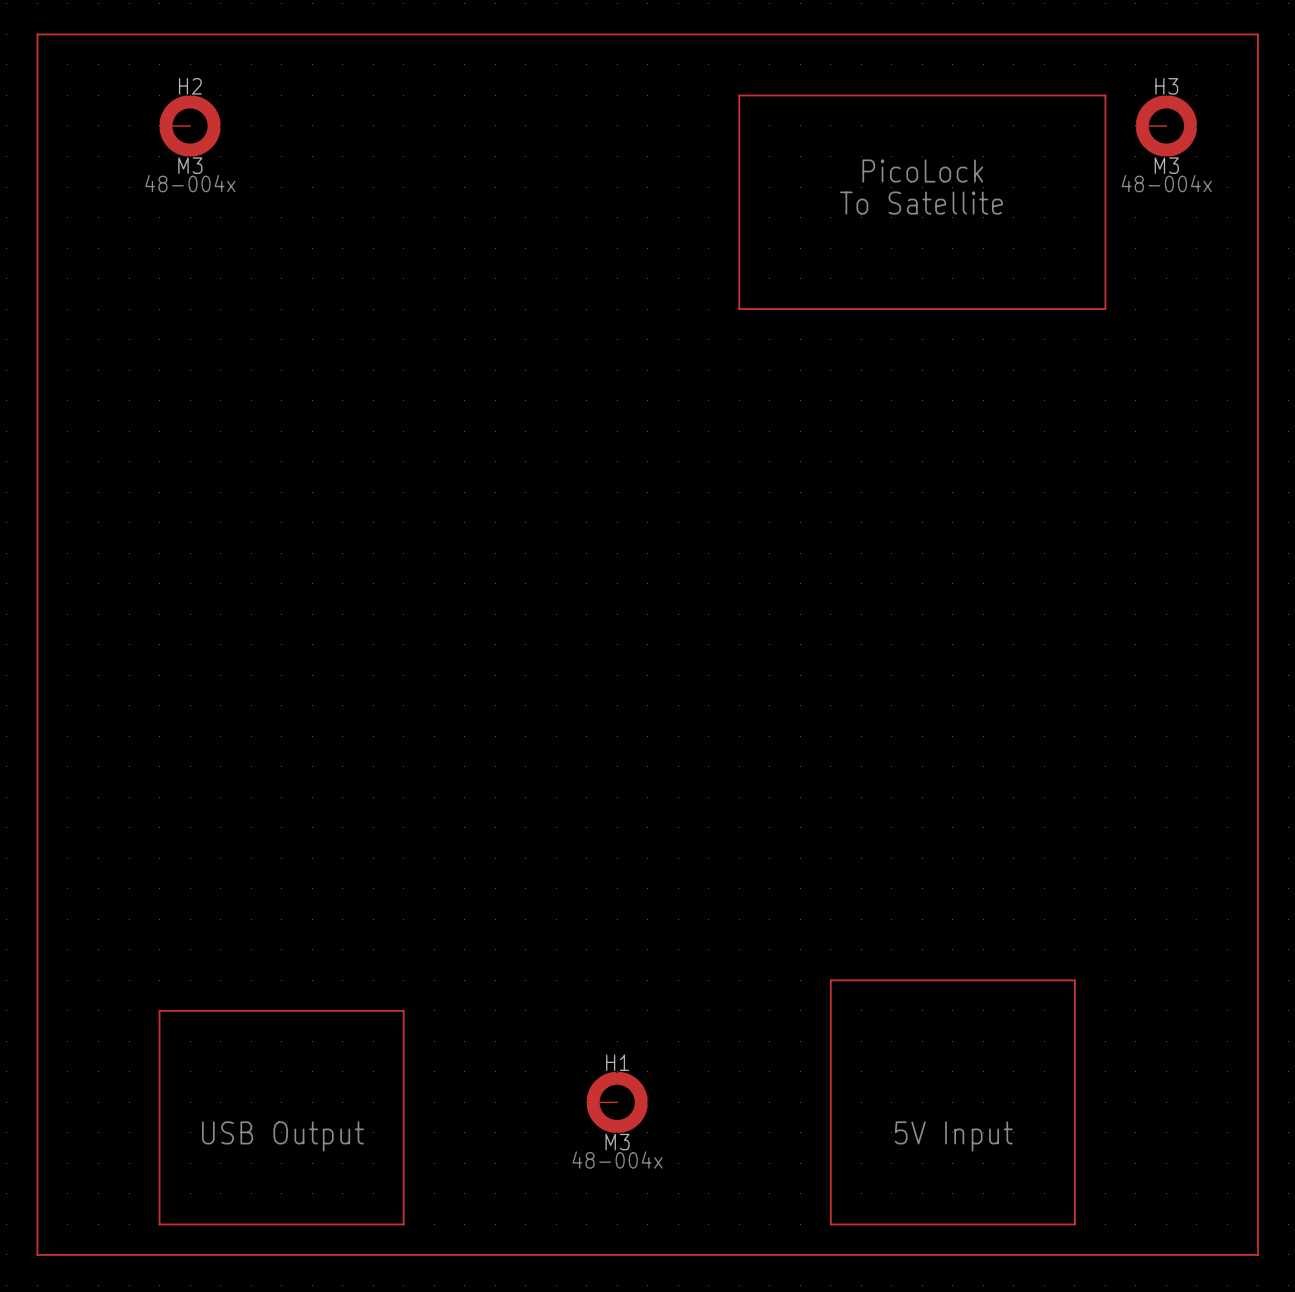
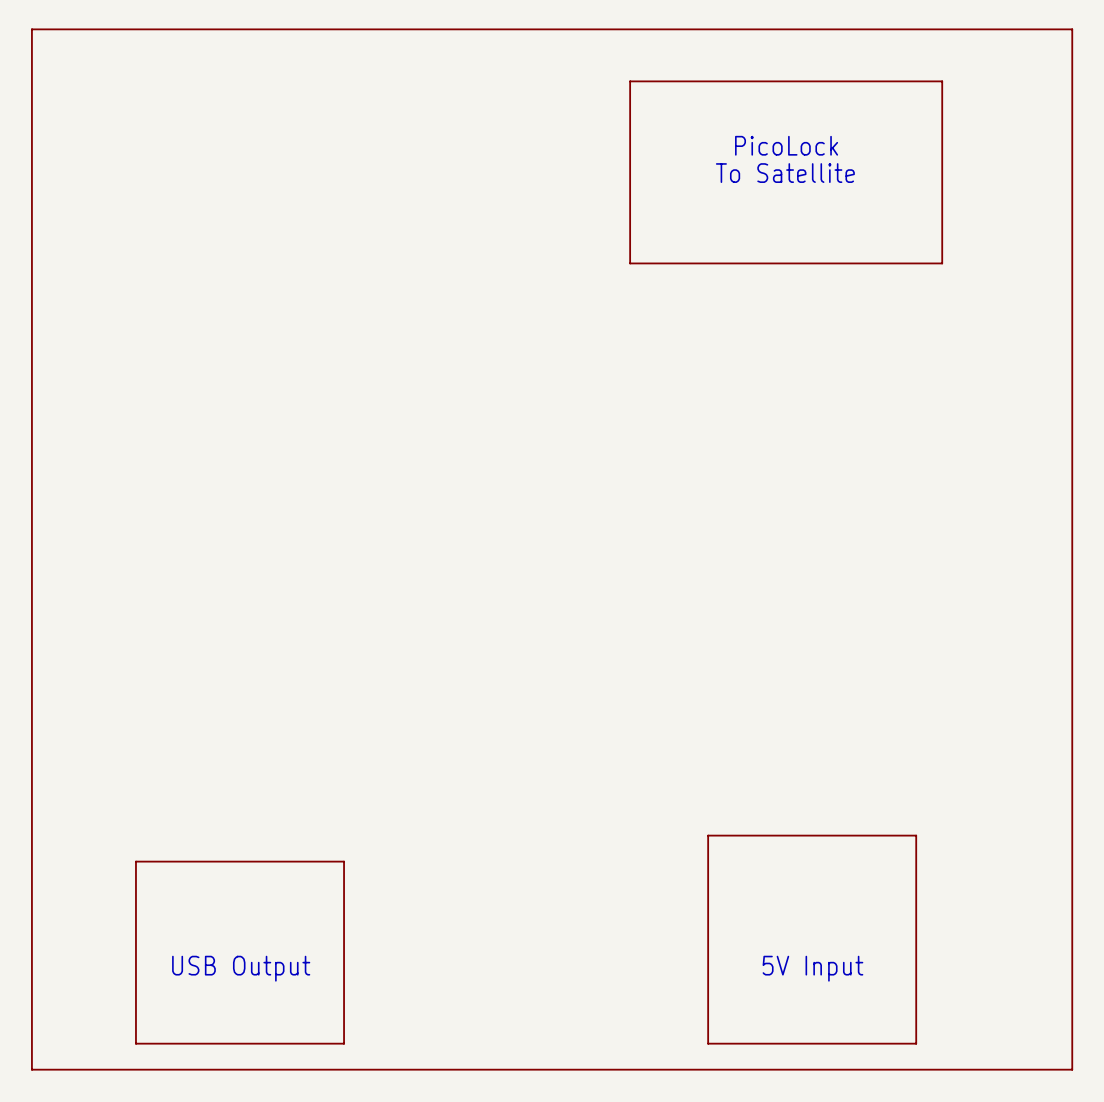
H2: M3 (190, 125) -> none
H3: M3 (1166, 125) -> none
H1: M3 (617, 1102) -> none

